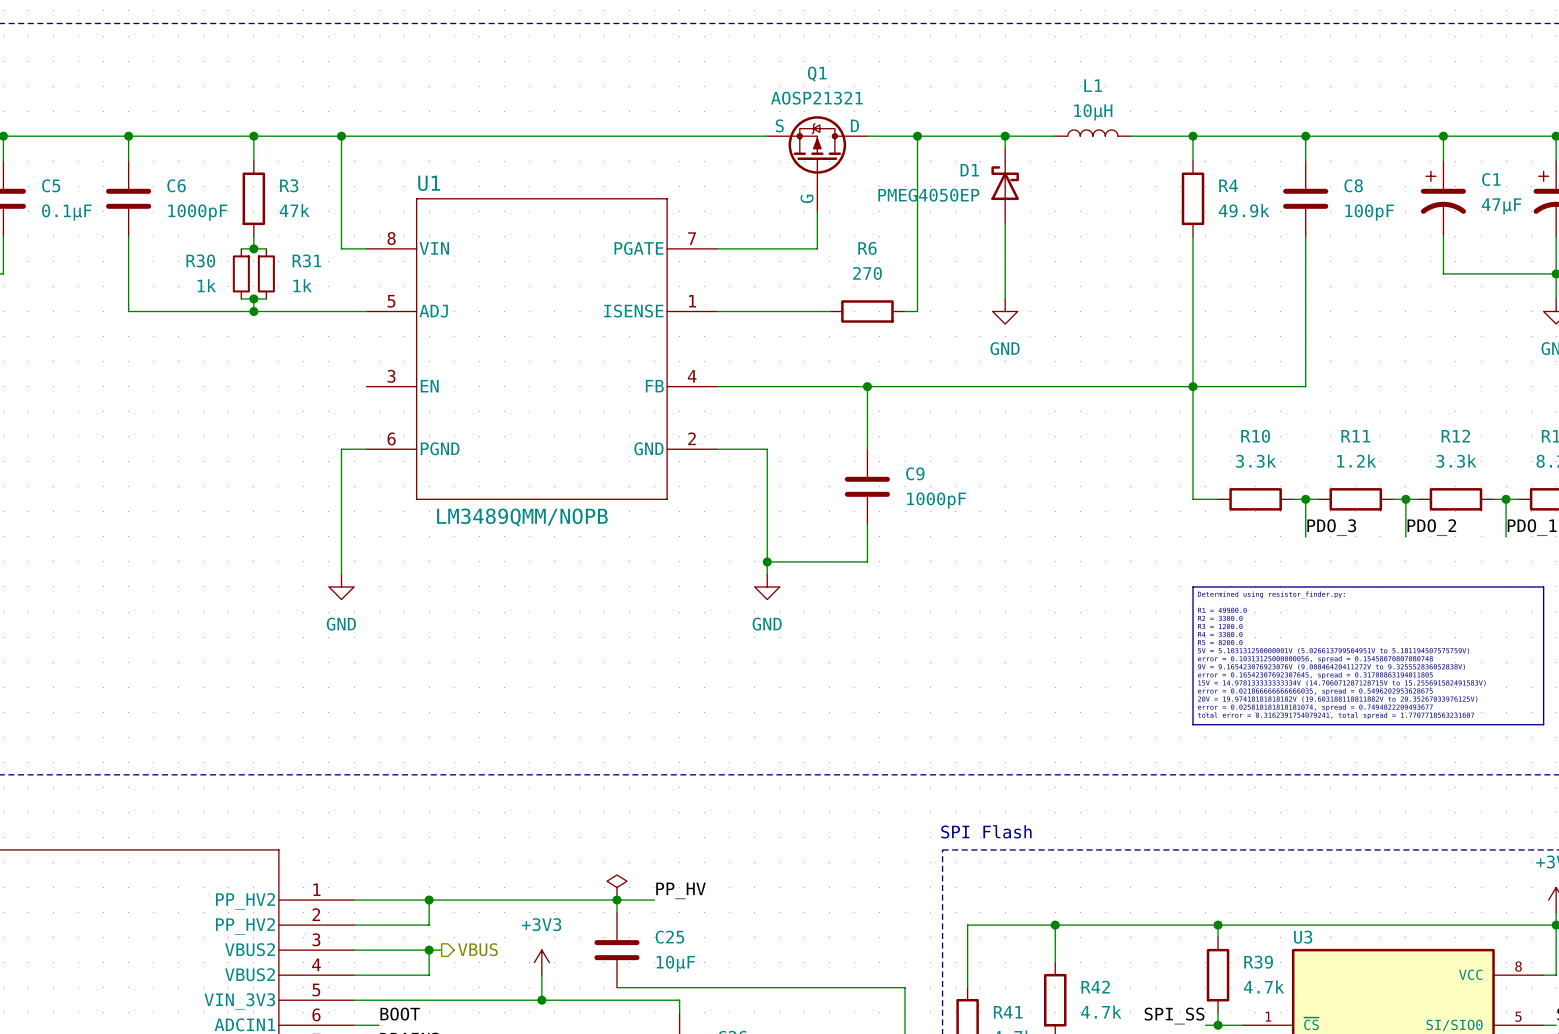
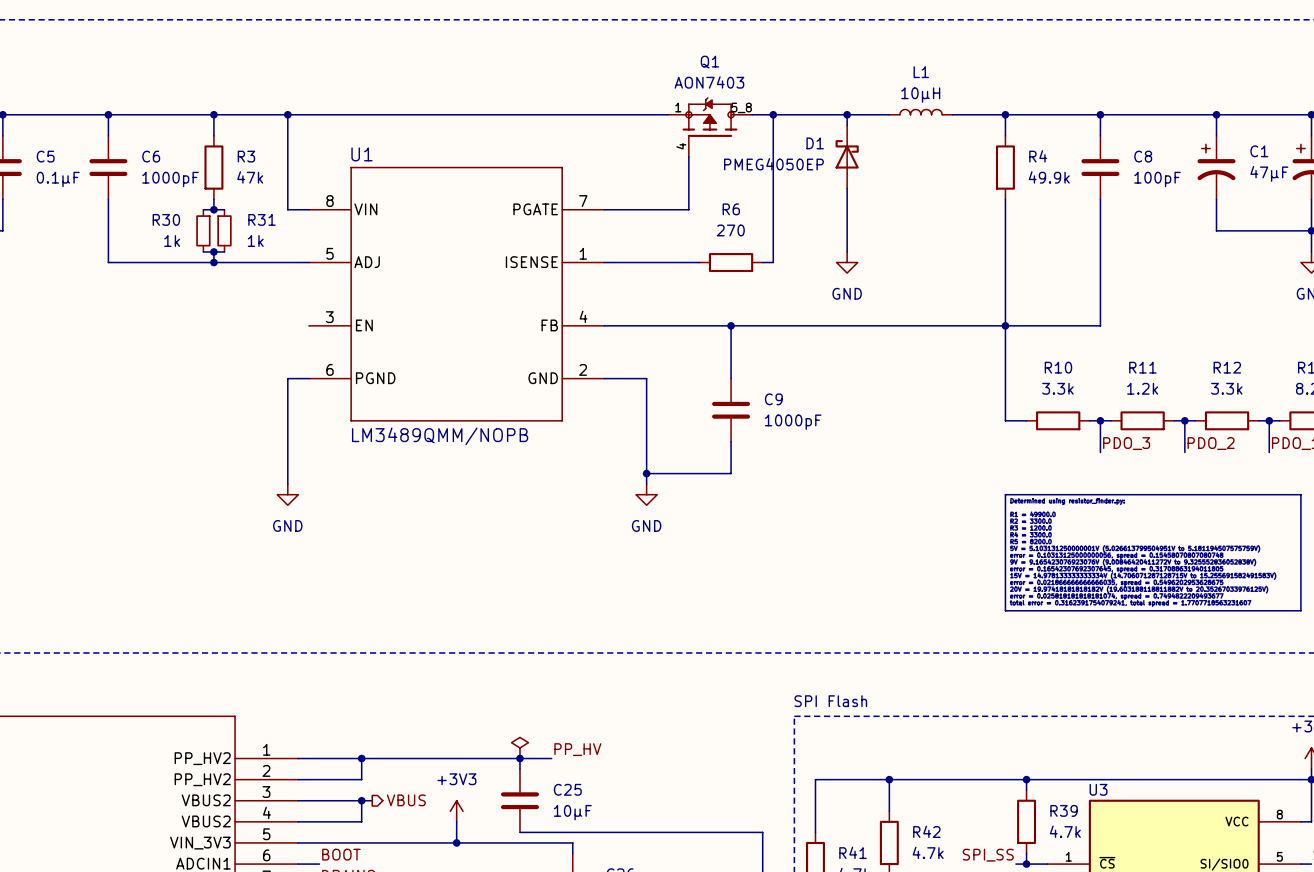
Q1 value: AOSP21321 (816, 98) -> AON7403 (709, 82)
Q1 symbol: [767, 116, 868, 212] -> [667, 97, 753, 157]

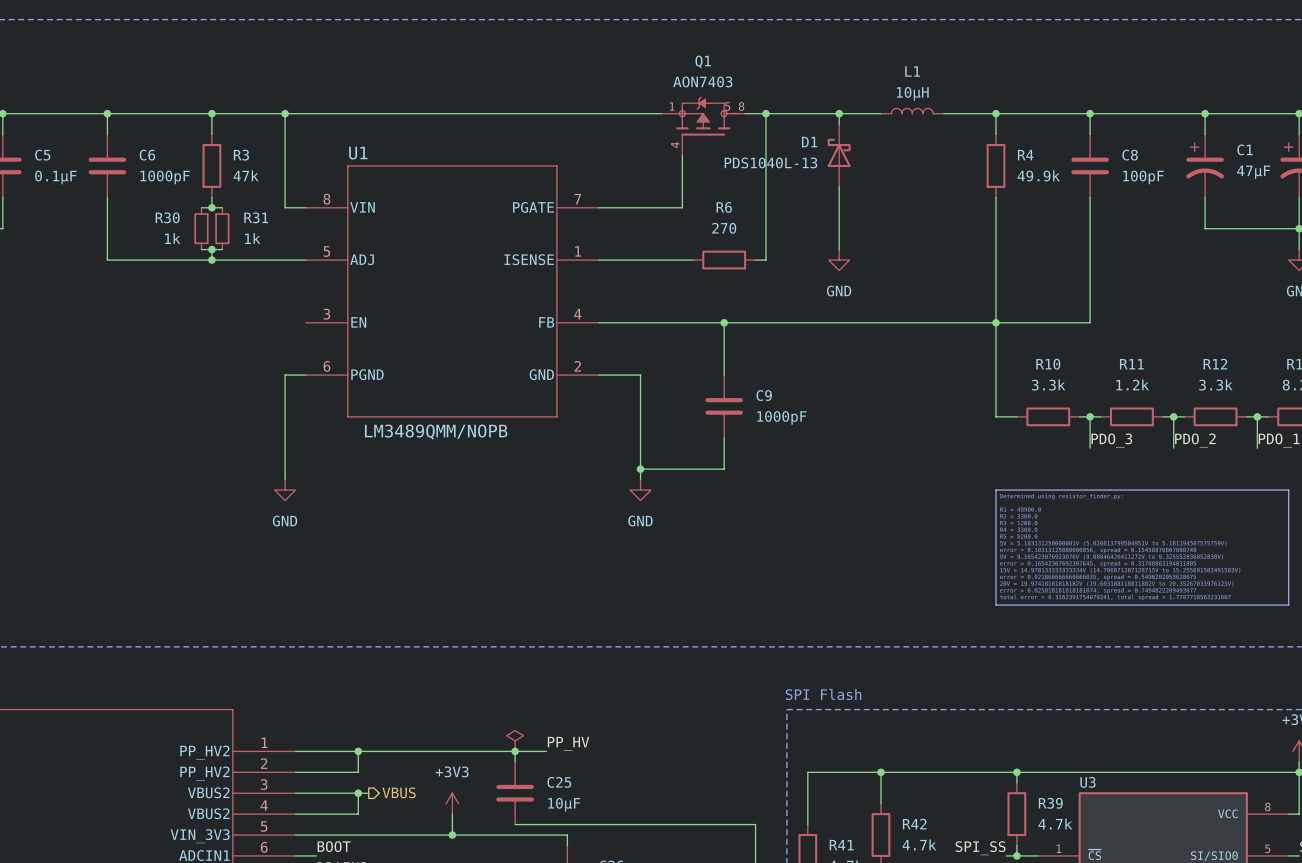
D1 value: PMEG4050EP (773, 164) -> PDS1040L-13 (770, 162)

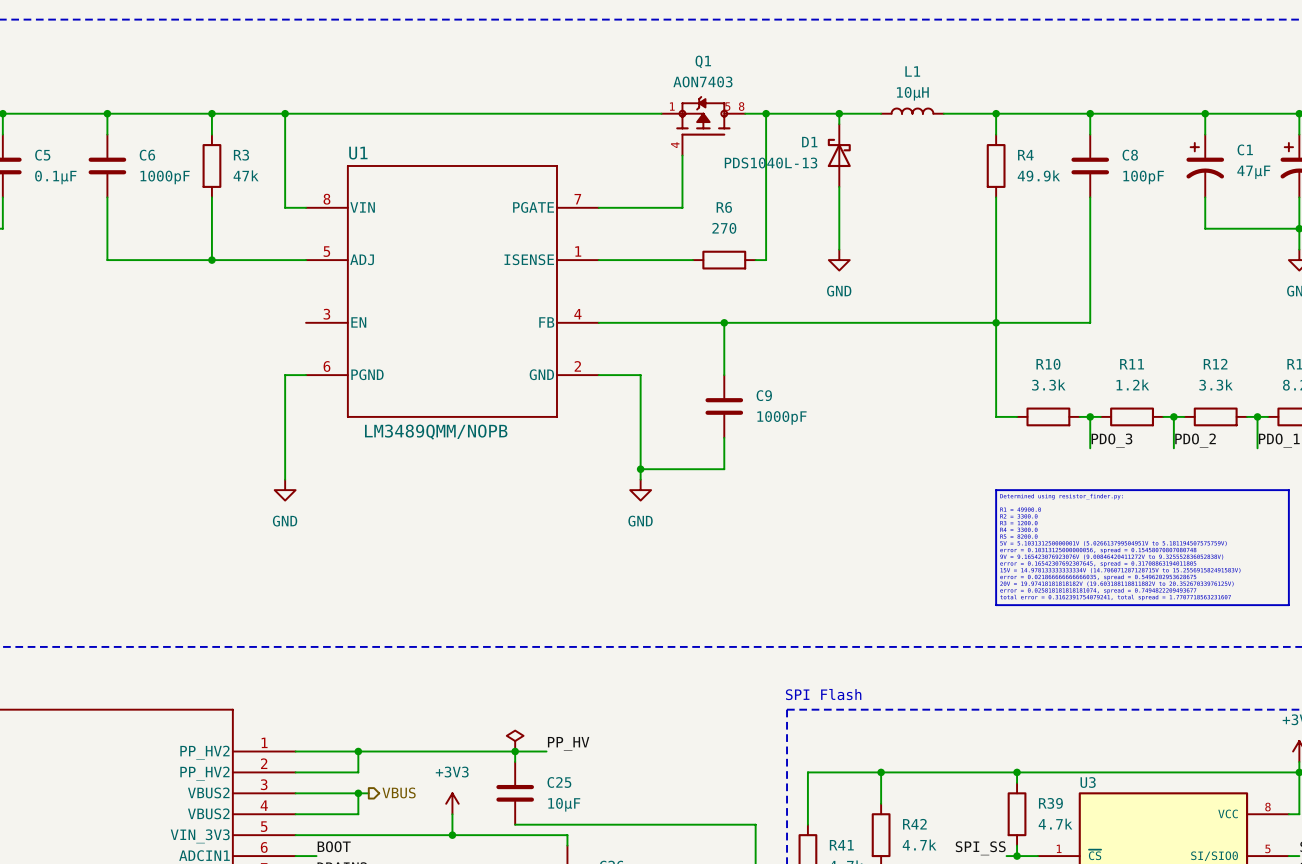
wire: (201, 207) (222, 207) -> none
wire: none -> (211, 207) (211, 249)
junction: (211, 207) -> none
R30: 1k (201, 228) -> none
R31: 1k (222, 228) -> none
wire: (201, 249) (222, 249) -> none
junction: (211, 249) -> none

